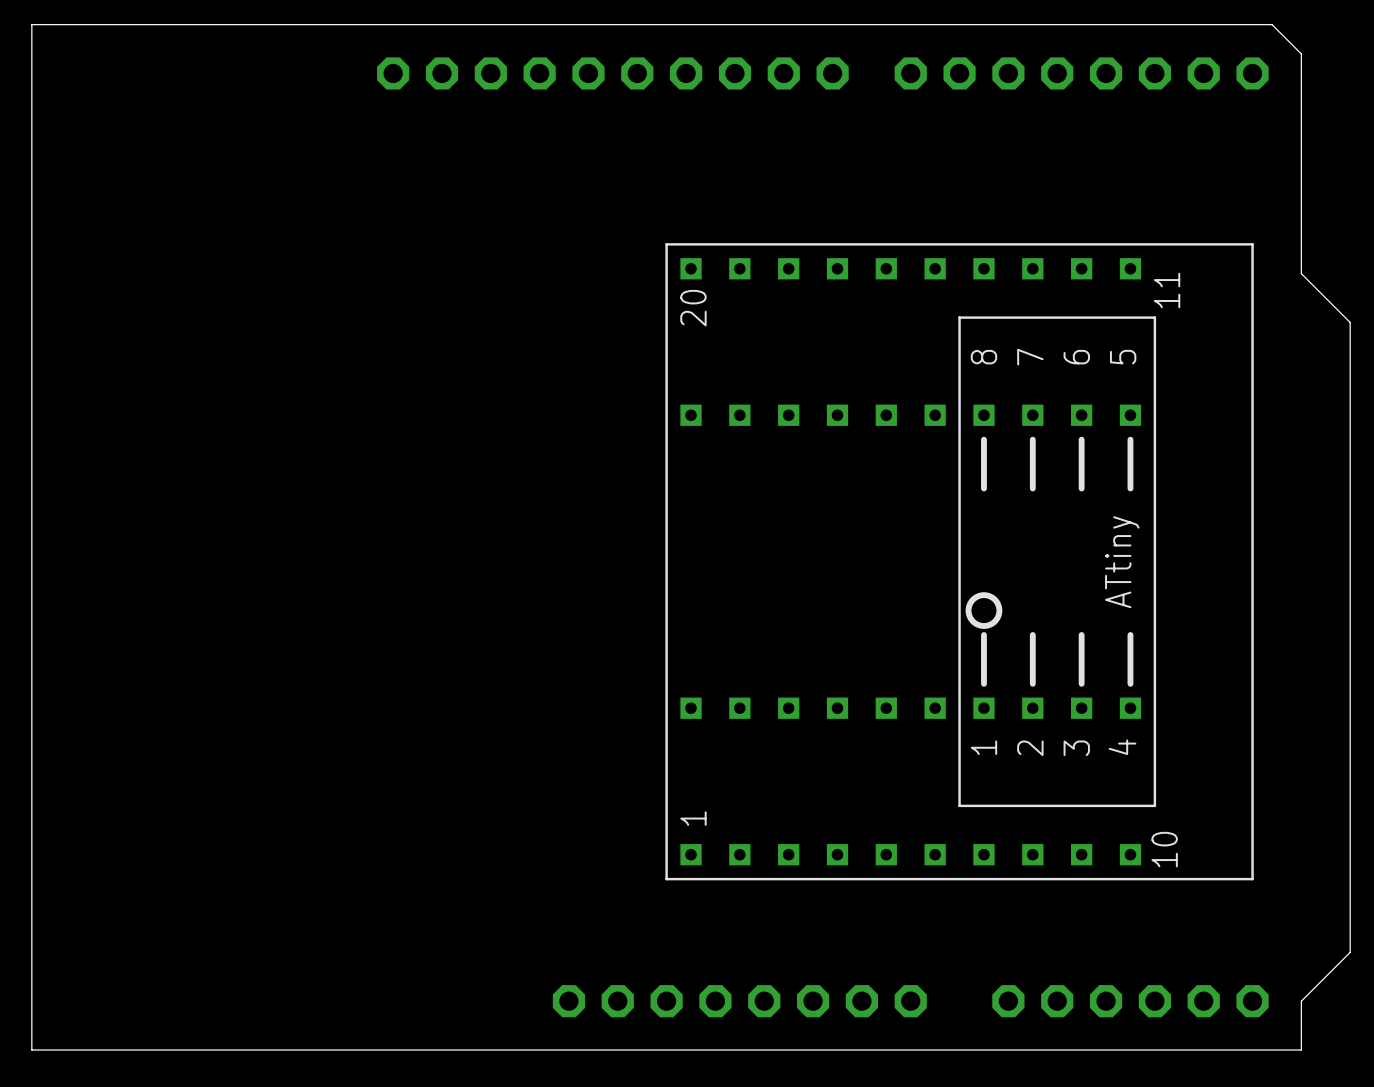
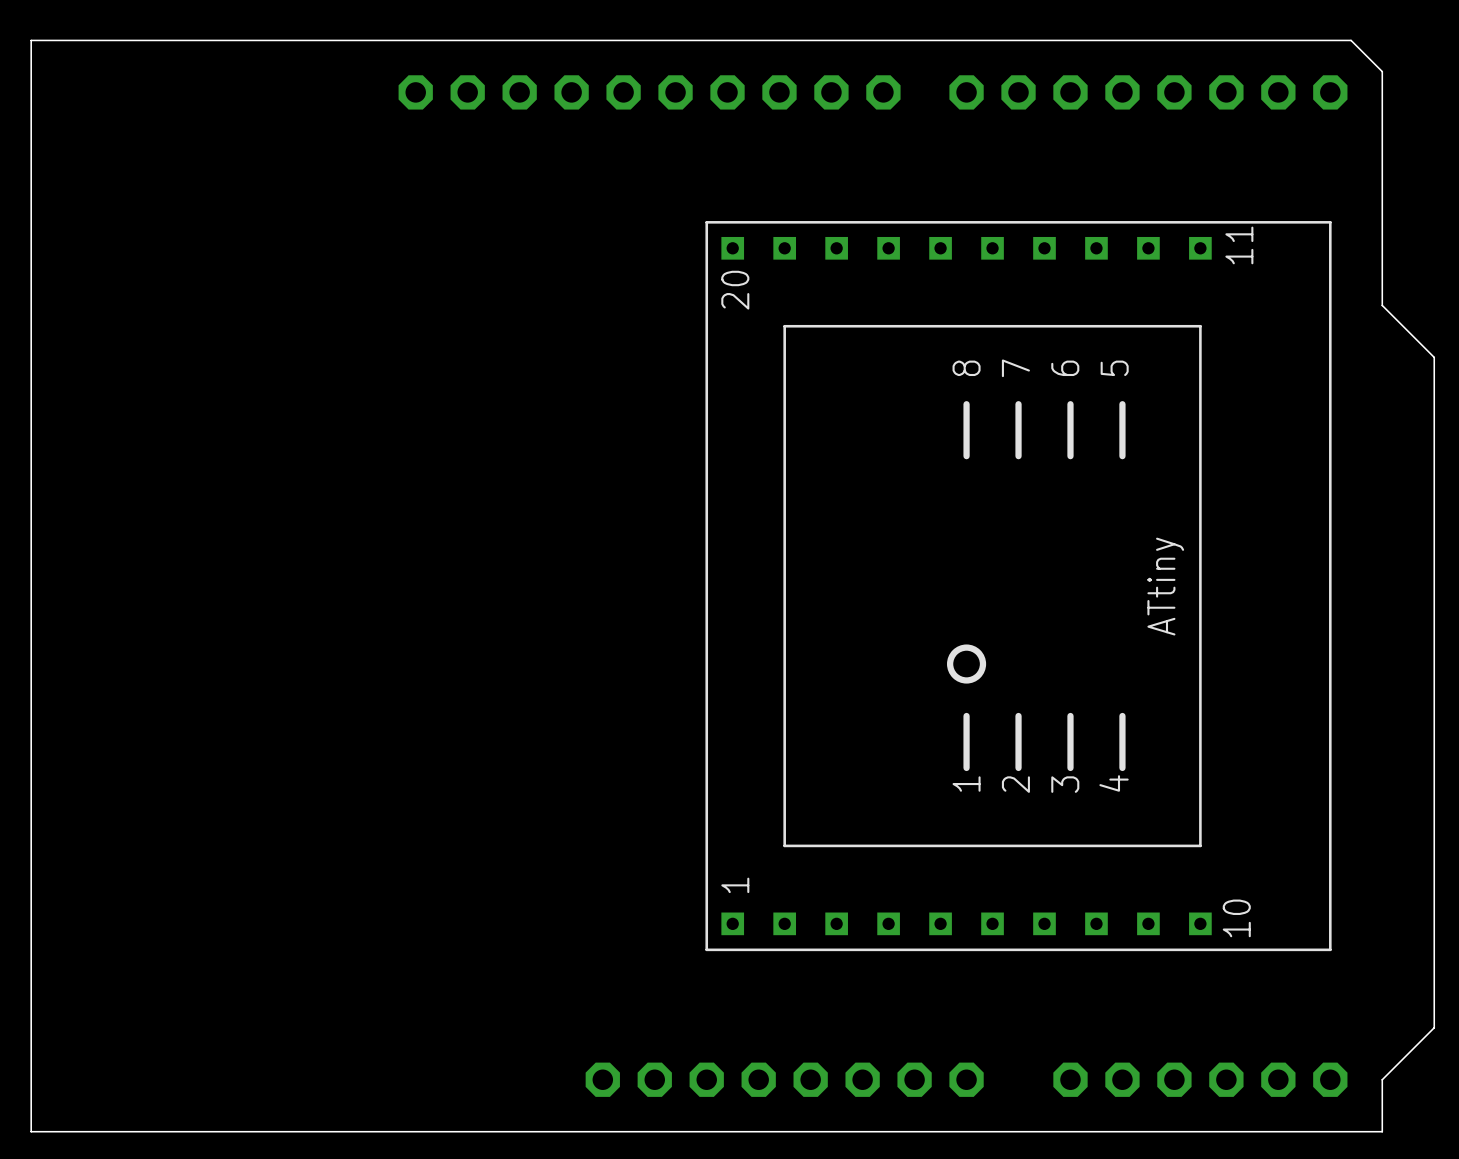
part: none -> (1018, 586)
part: (959, 561) -> none

